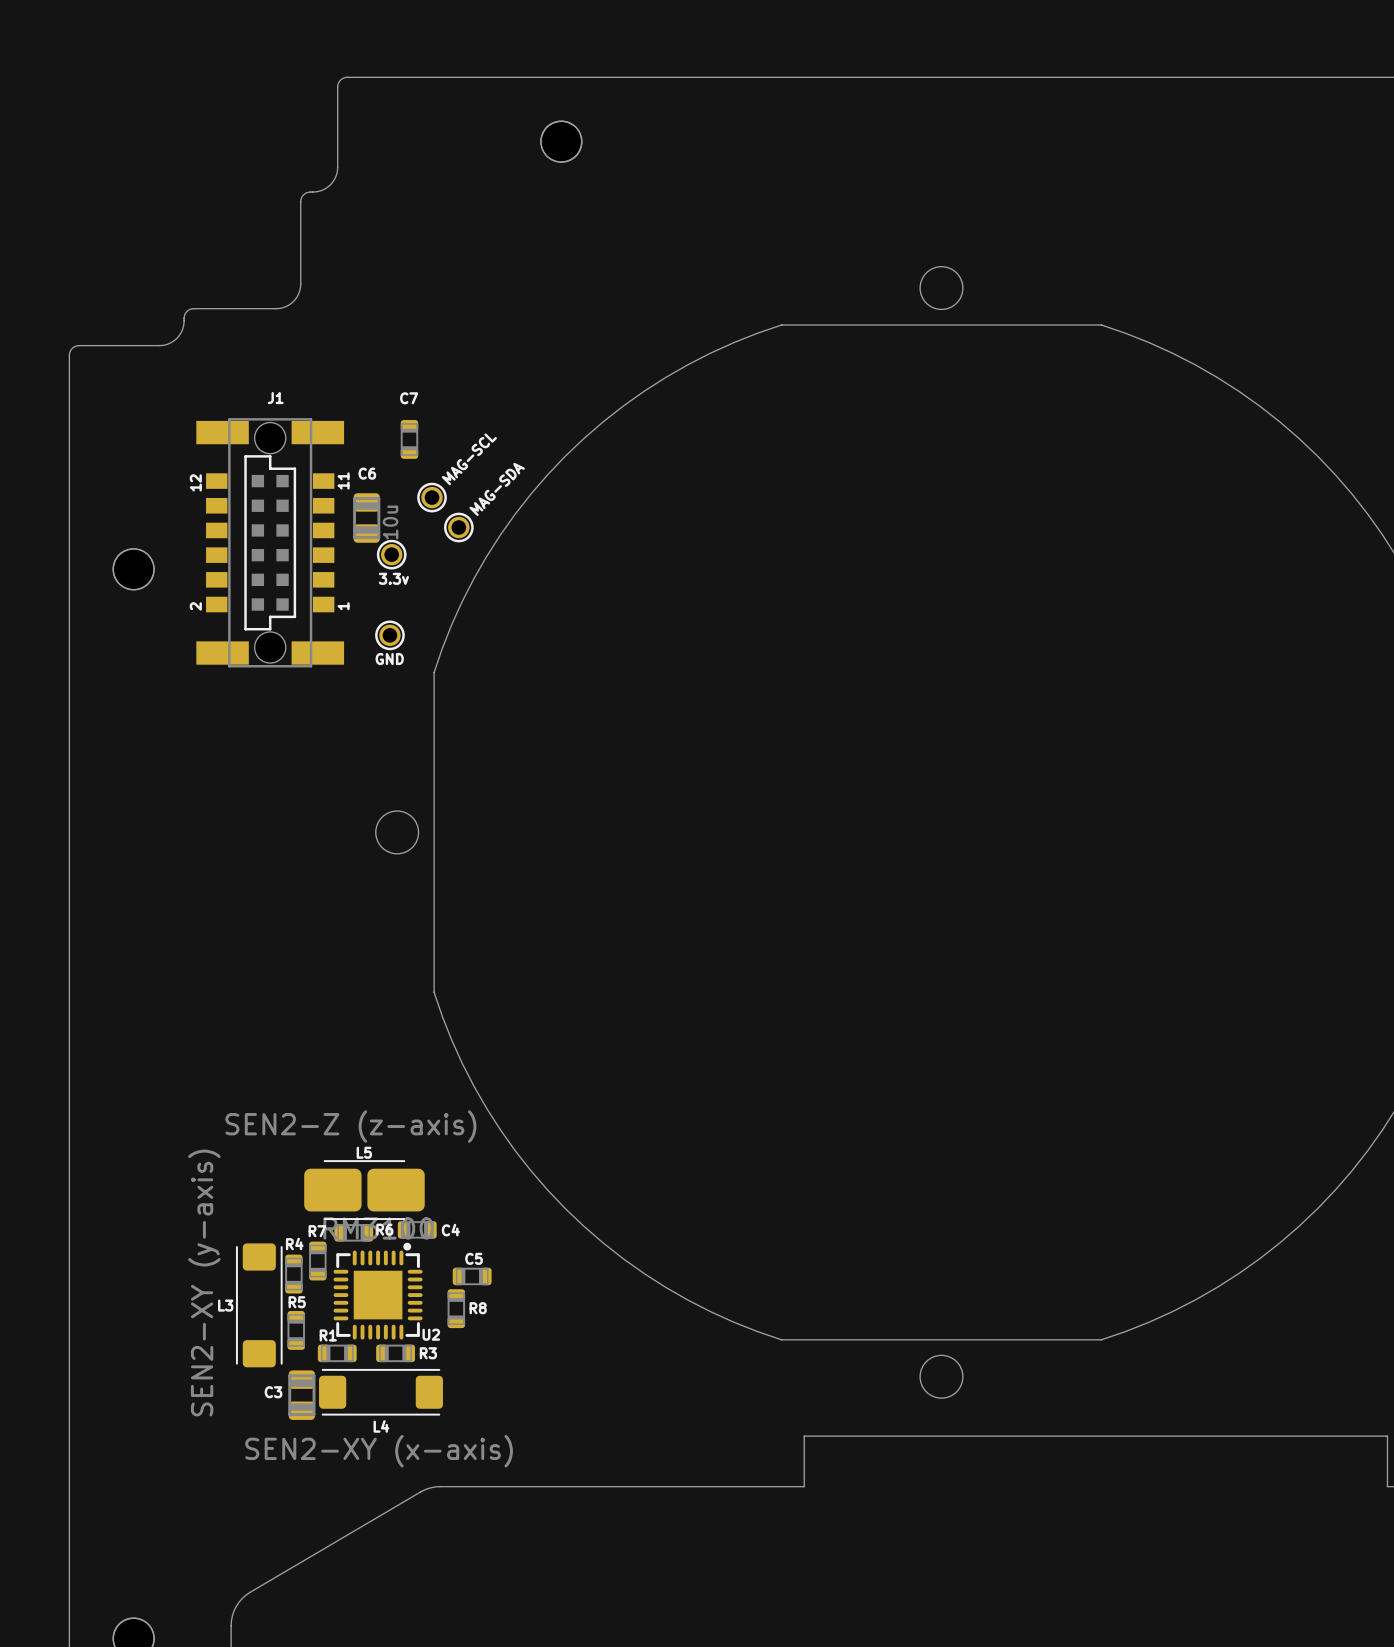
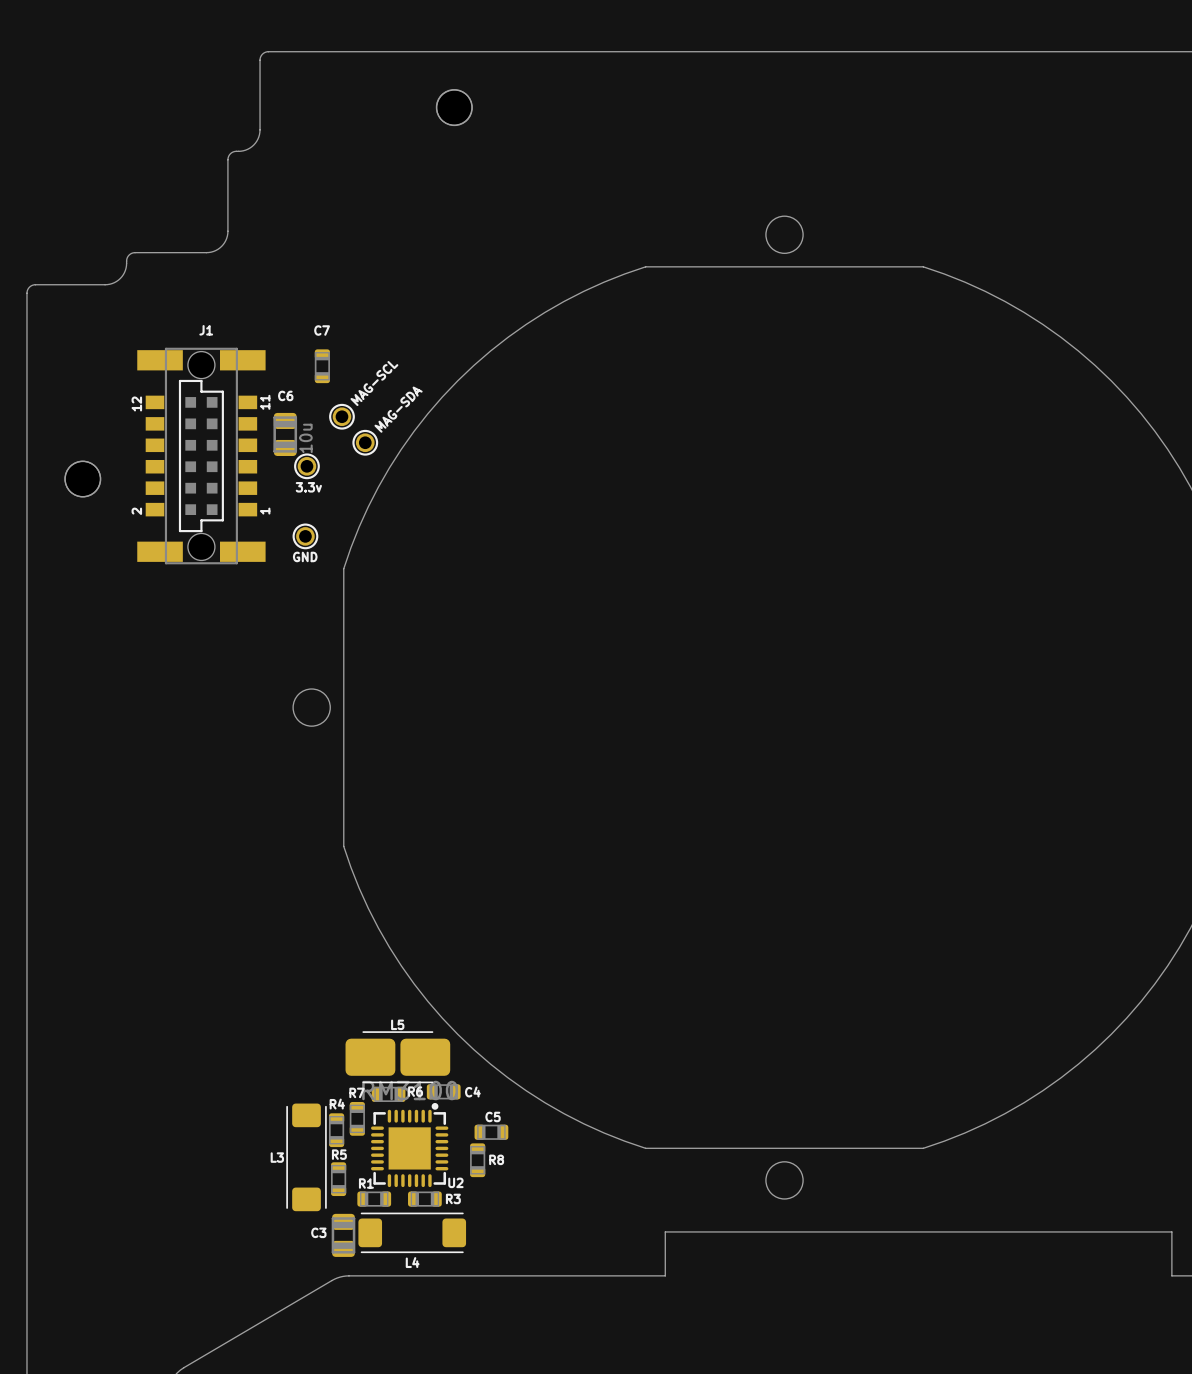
L5 value: SEN2-Z (z-axis) (350, 1126) -> none
L5 position: (364, 1190) -> (397, 1057)
C4 position: (417, 1229) -> (443, 1091)
R6 position: (353, 1232) -> (388, 1094)
R7 position: (317, 1261) -> (357, 1118)
R4 position: (293, 1274) -> (336, 1130)
C5 position: (472, 1276) -> (491, 1132)
L3 value: SEN2-XY (y-axis) (204, 1283) -> none
U2 position: (378, 1291) -> (409, 1145)
L3 position: (259, 1305) -> (306, 1157)
R8 position: (456, 1308) -> (477, 1160)
R5 position: (296, 1330) -> (338, 1179)
R1 position: (337, 1353) -> (374, 1199)
R3 position: (395, 1353) -> (424, 1199)
L4 position: (380, 1392) -> (412, 1232)
C3 position: (301, 1395) -> (343, 1235)
L4 value: SEN2-XY (x-axis) (379, 1451) -> none

